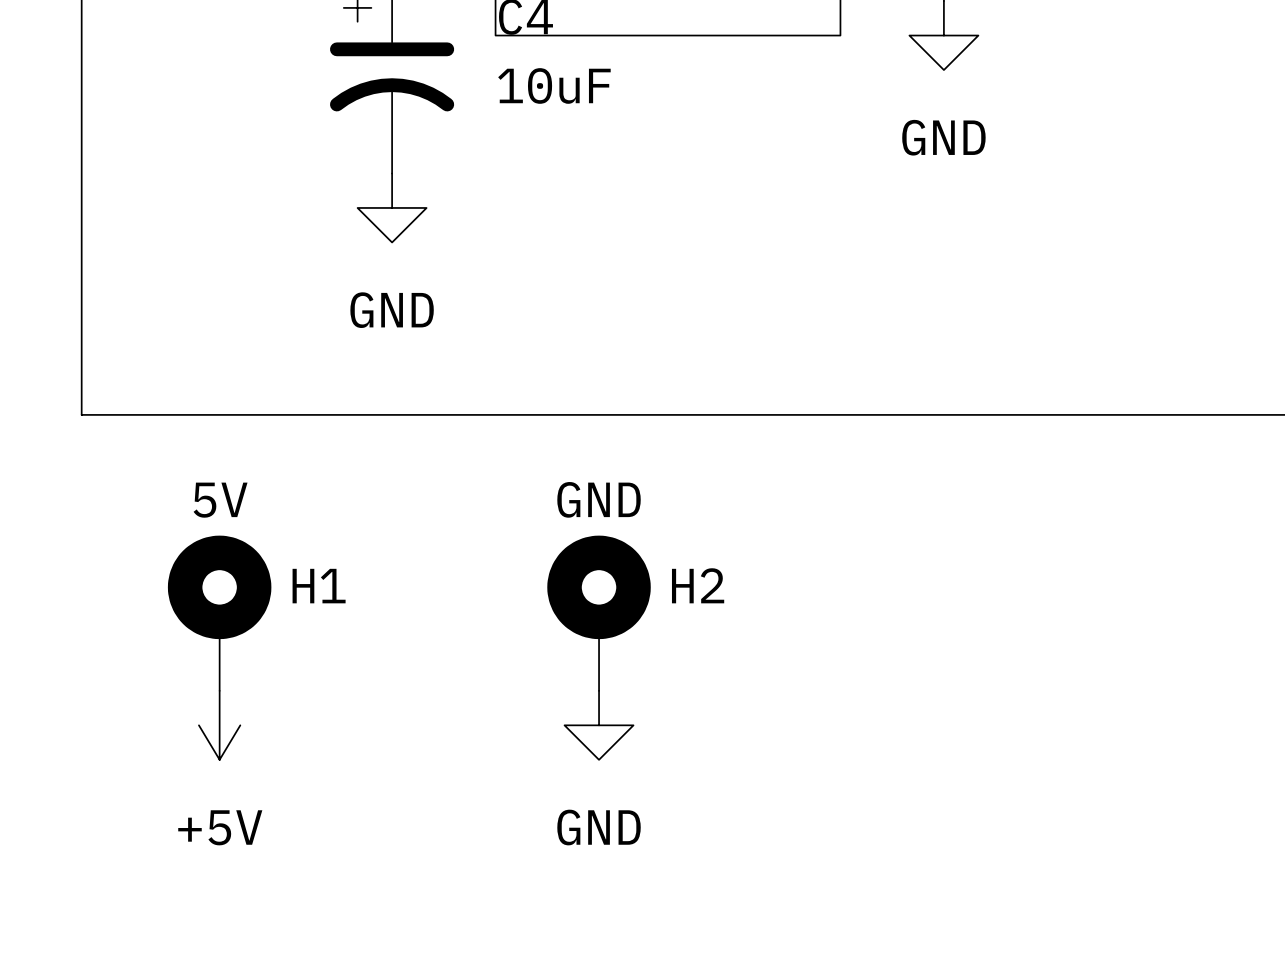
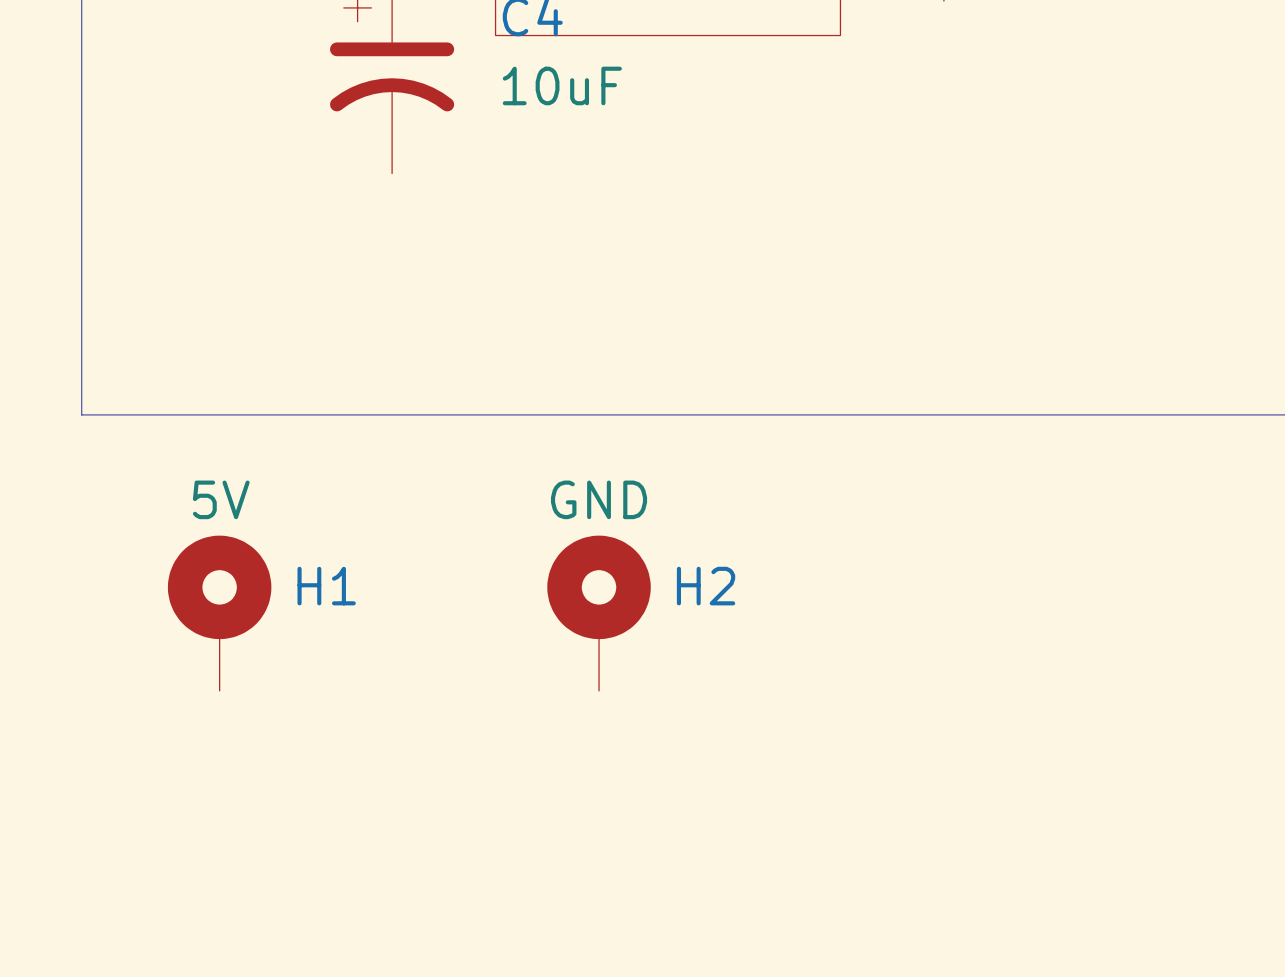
power symbol: GND (943, 35) -> none
power symbol: GND (392, 207) -> none
power symbol: +5V (219, 725) -> none
power symbol: GND (599, 725) -> none

